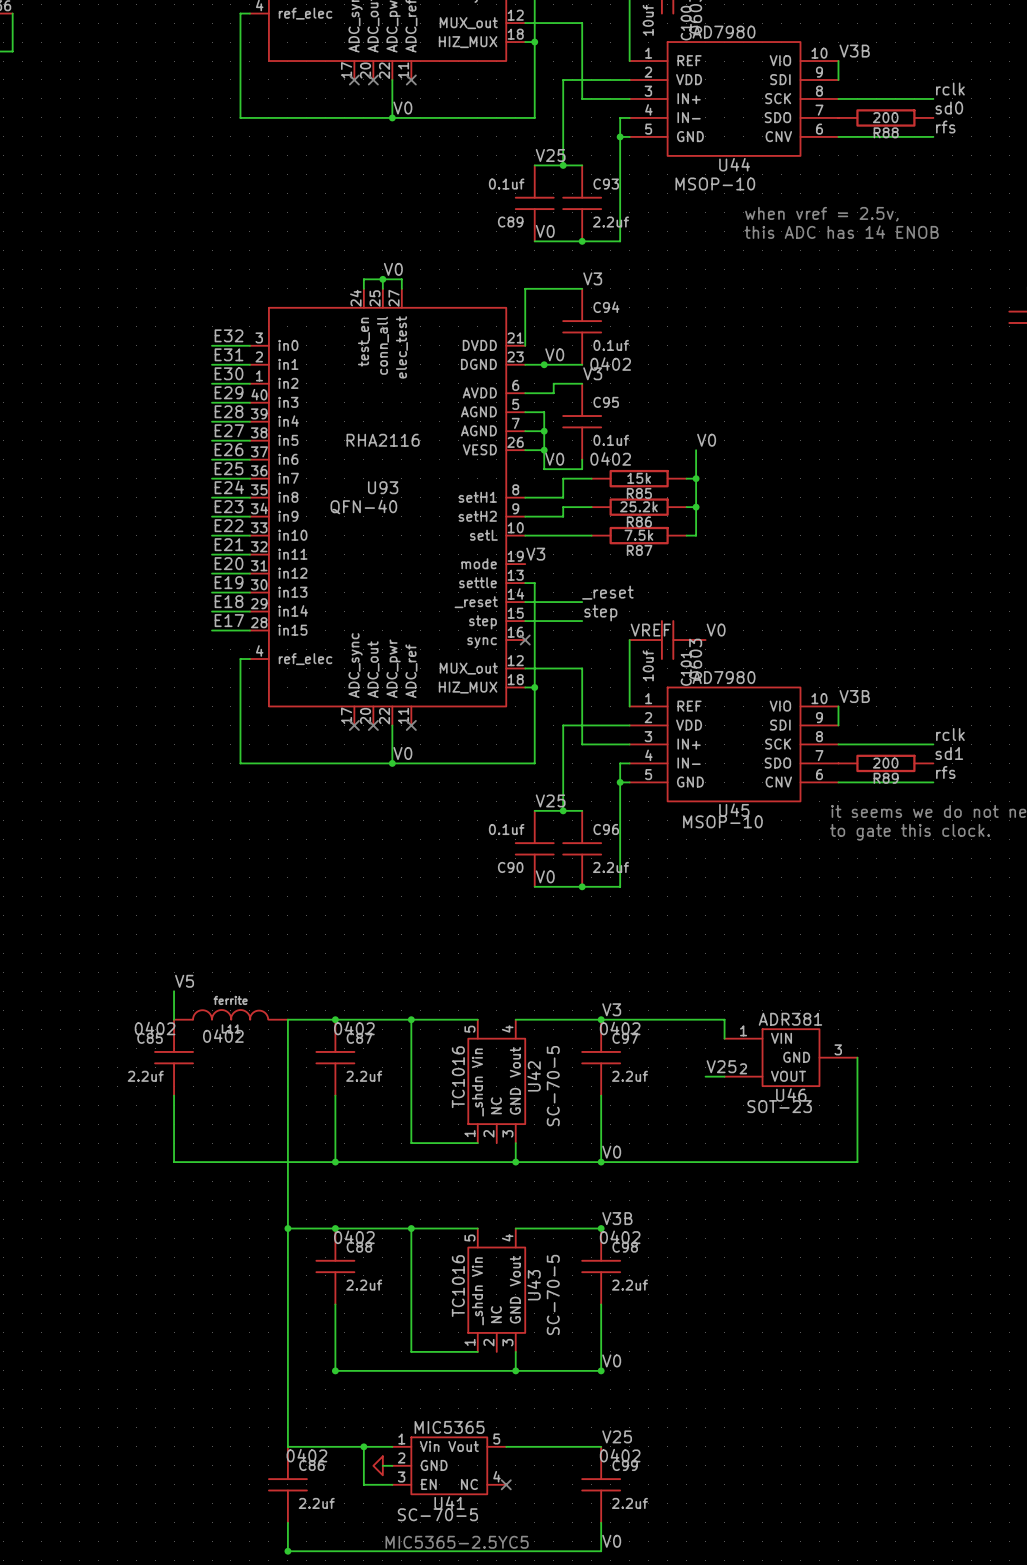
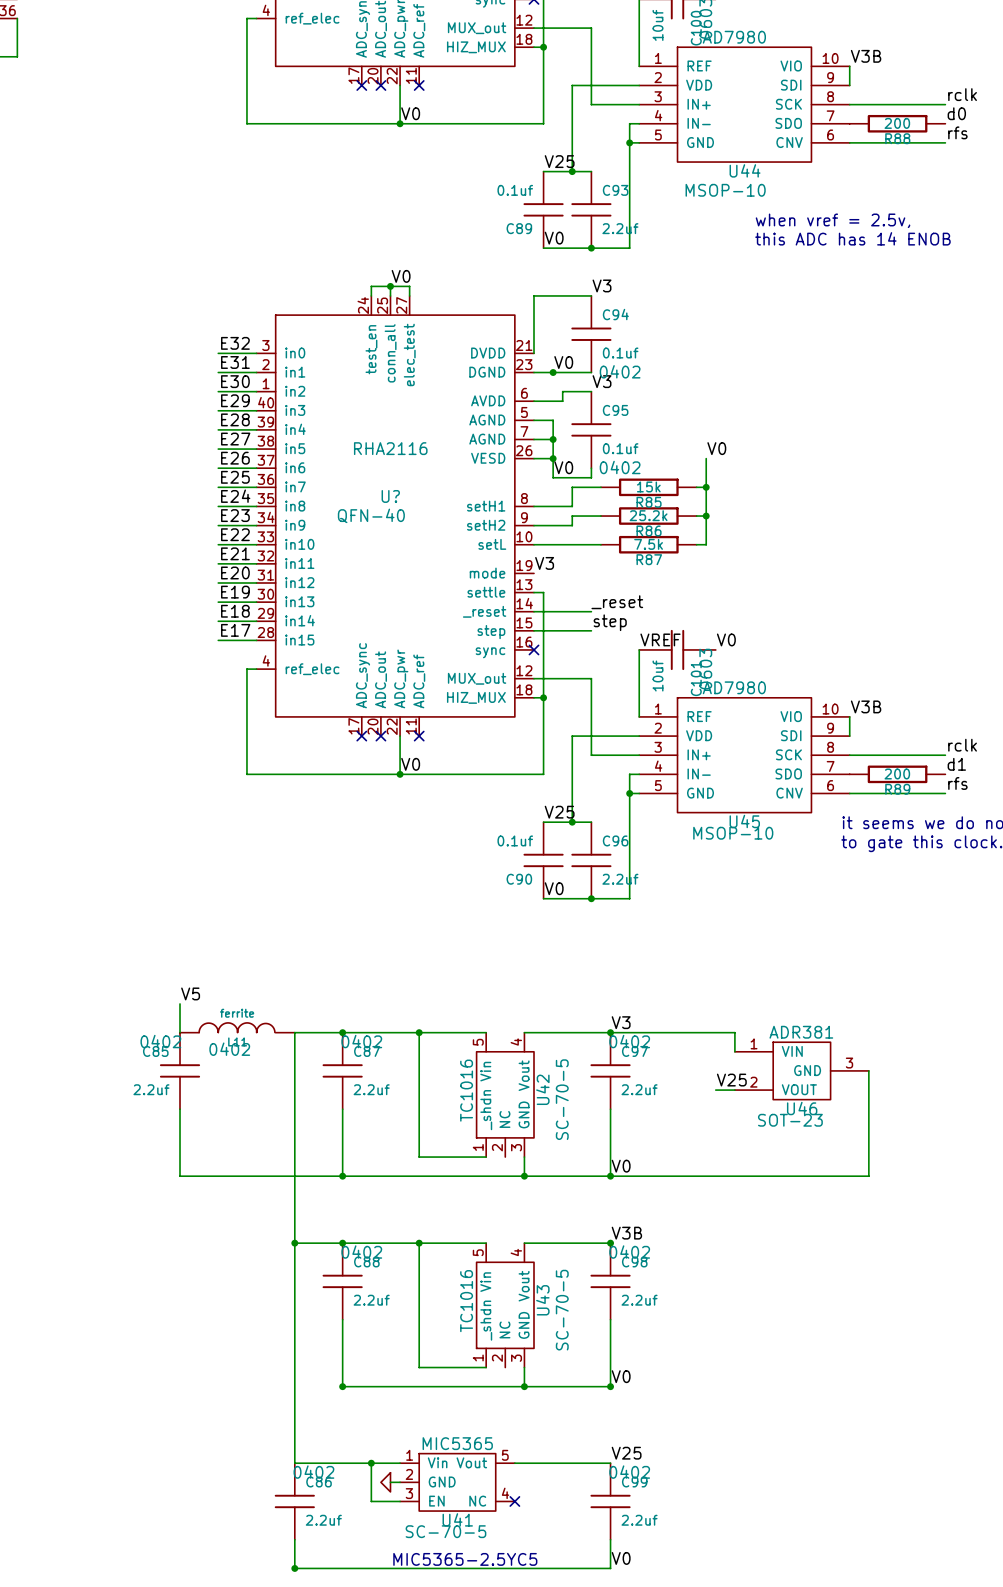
label: sd0 (949, 108) -> d0 (956, 113)
U93 name: U93 (383, 487) -> U? (390, 496)
label: sd1 (949, 753) -> d1 (956, 764)

